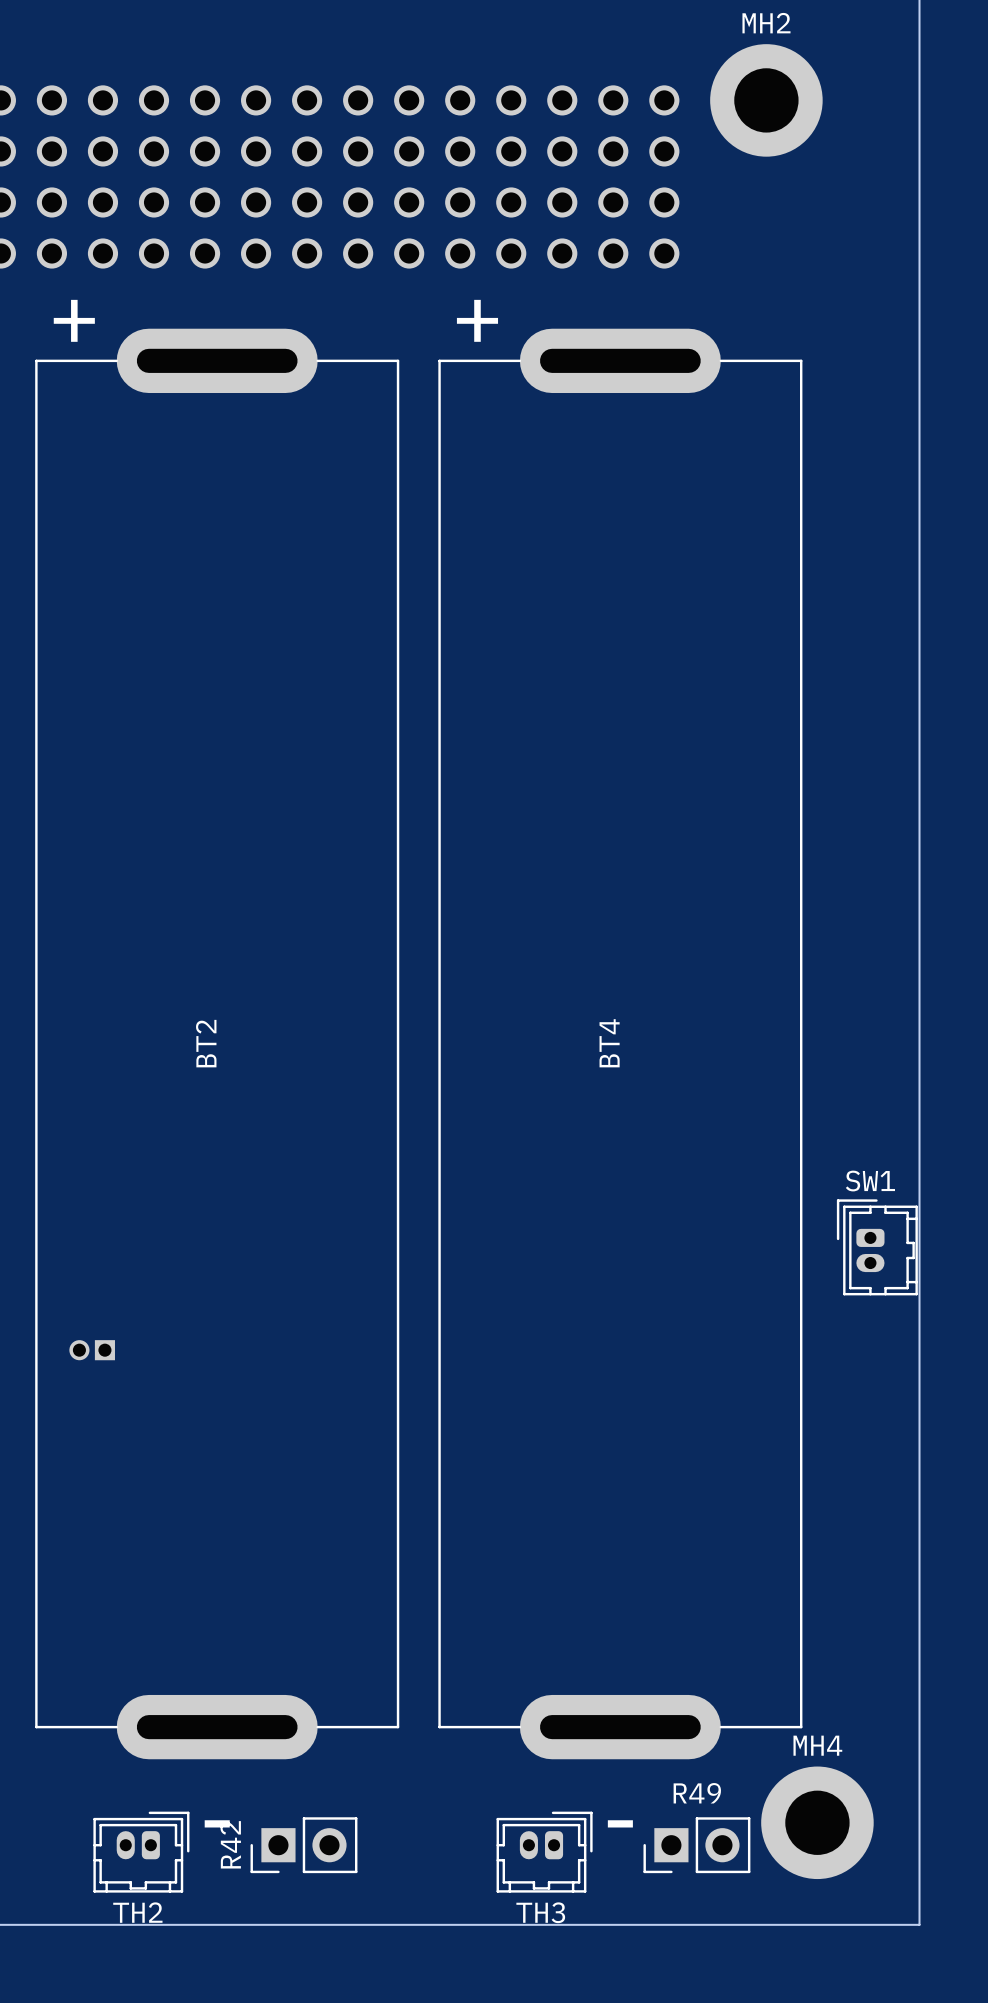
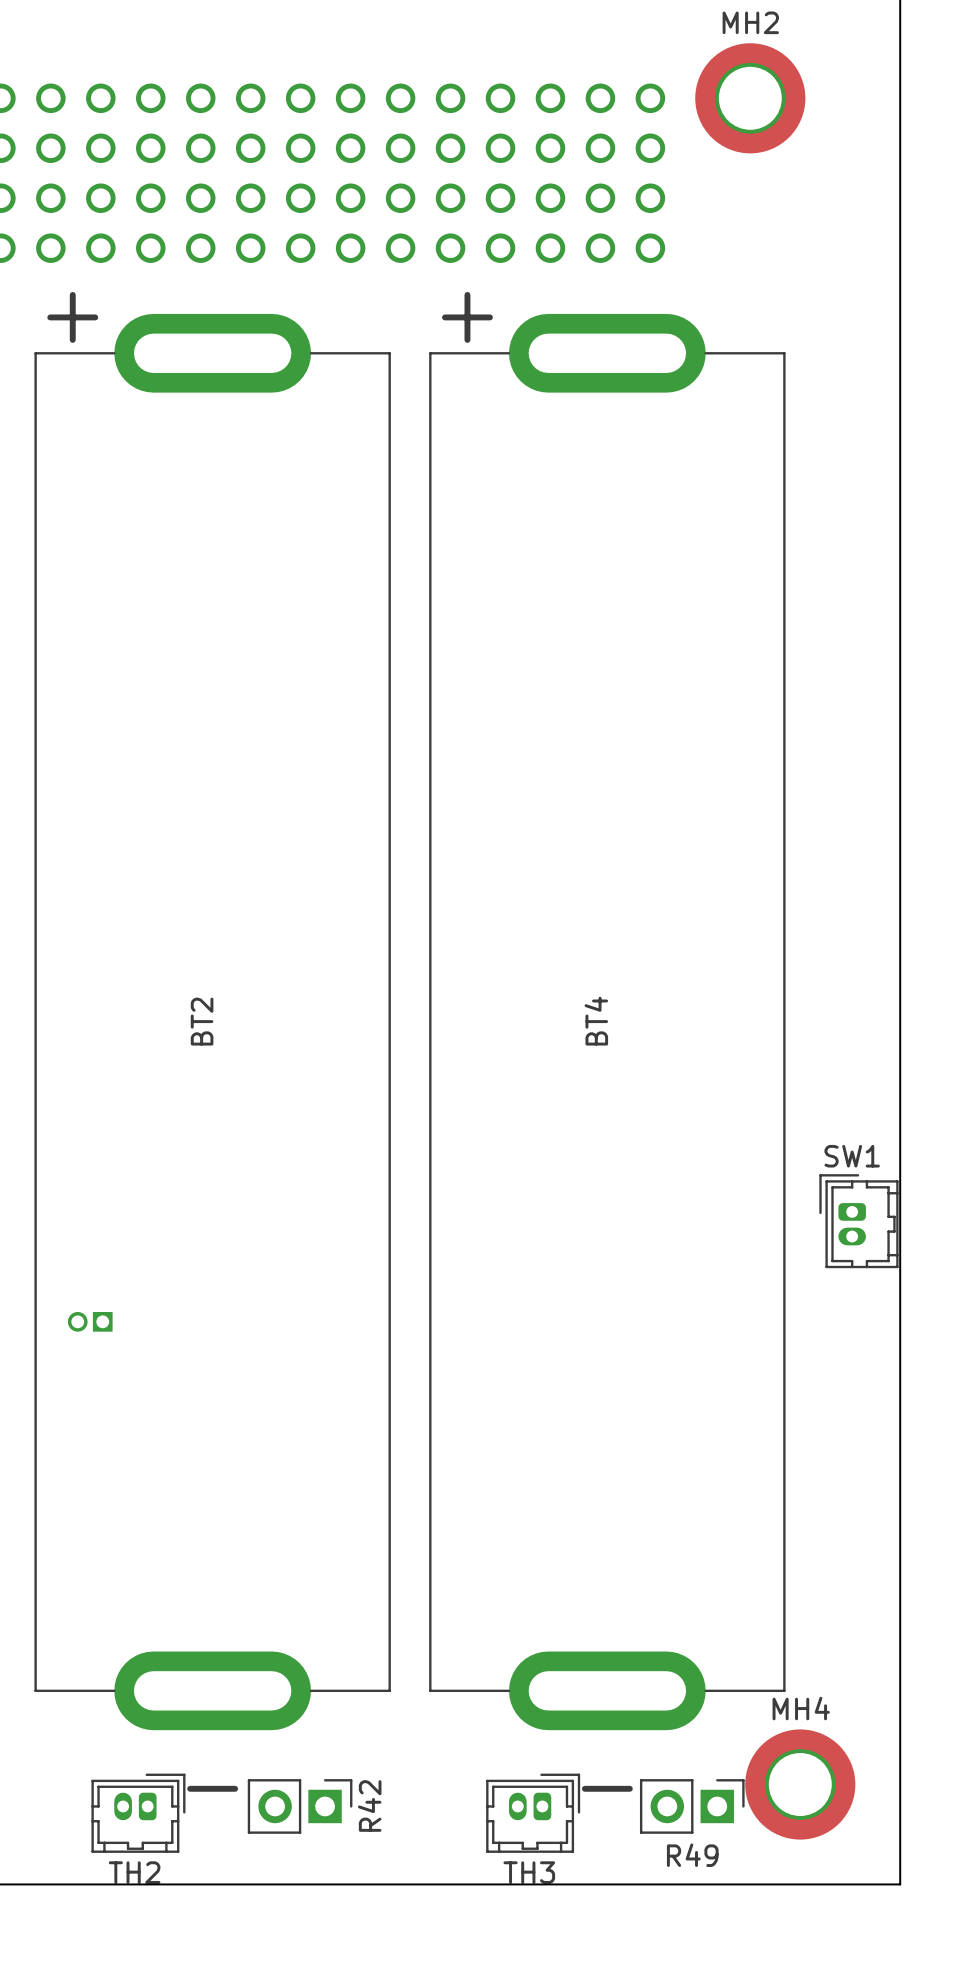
BT2 footprint: [35, 328, 400, 1760] -> [34, 313, 391, 1731]
BT4 footprint: [438, 328, 803, 1760] -> [429, 313, 786, 1731]
R42 rotation: 0° (303, 1845) -> 180° (300, 1806)
R49 rotation: 0° (696, 1845) -> 180° (692, 1806)

